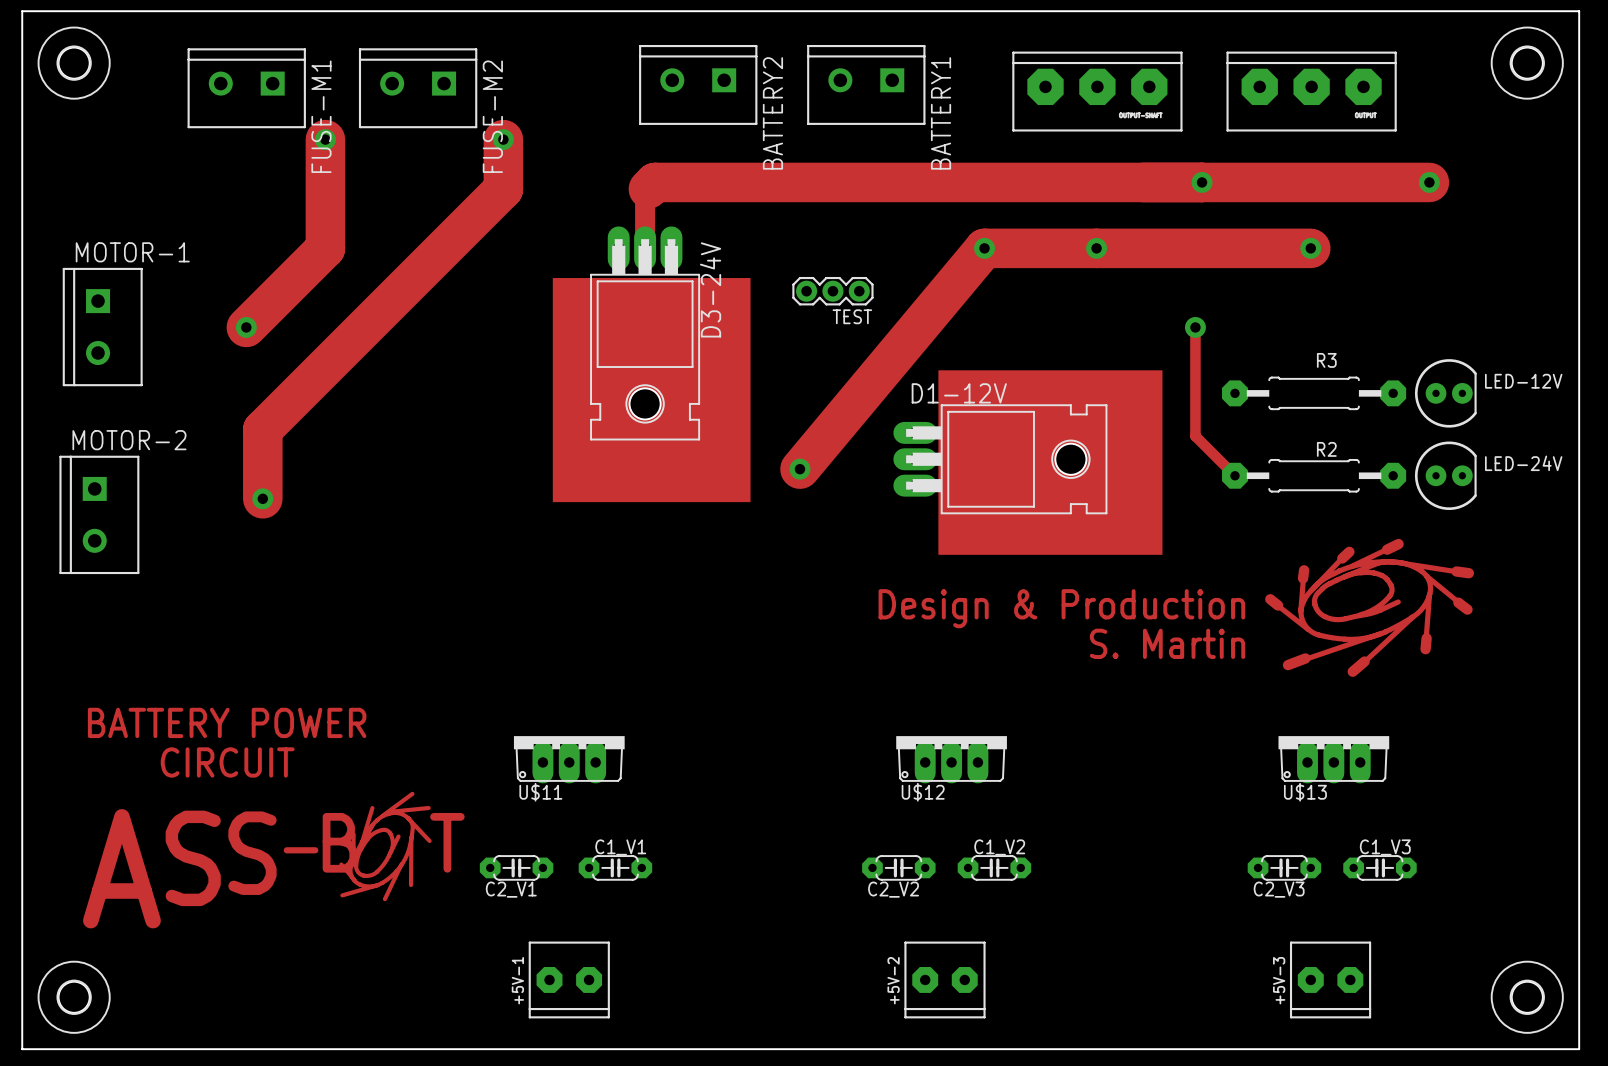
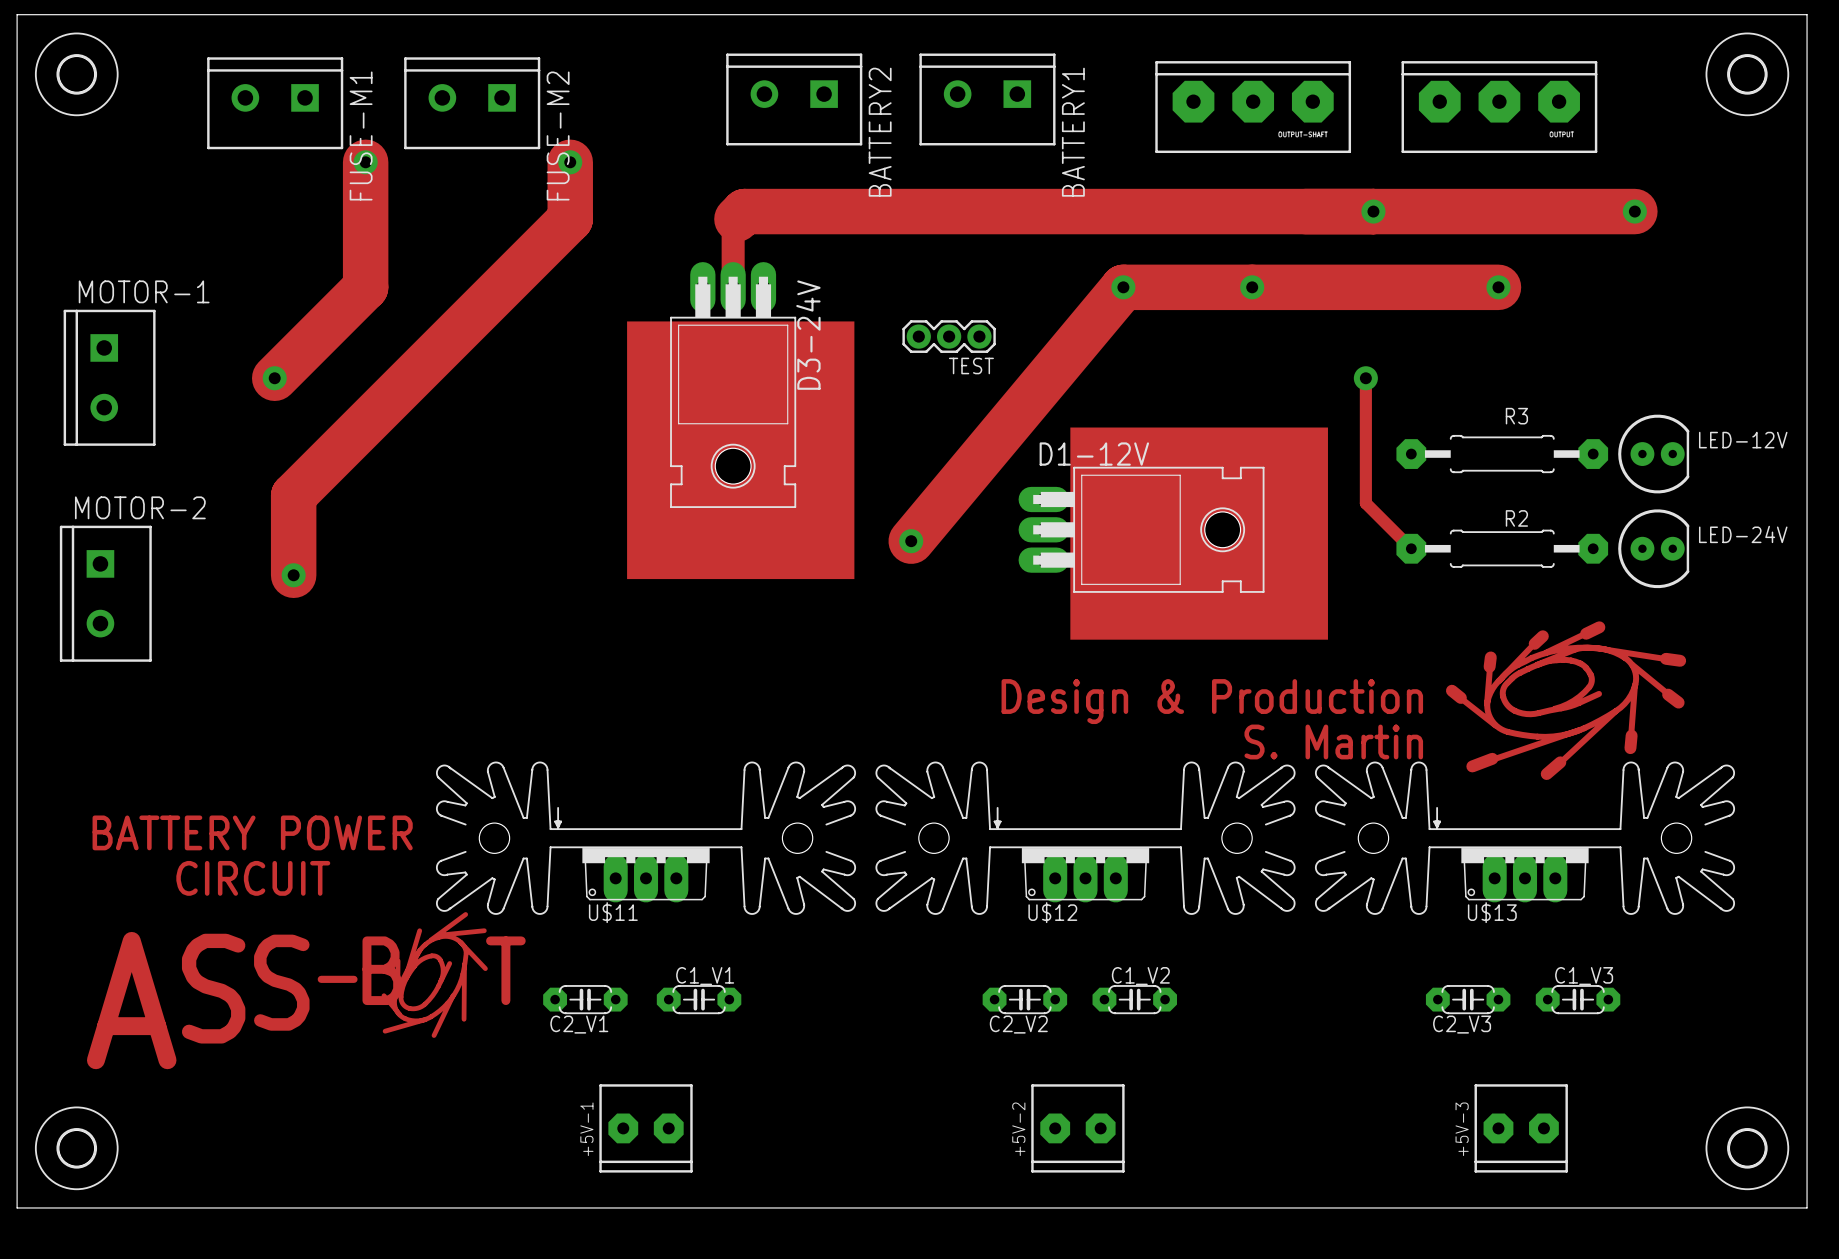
U$11 footprint: [513, 736, 625, 784] -> [435, 761, 857, 915]
U$12 footprint: [896, 736, 1007, 784] -> [875, 761, 1296, 915]
U$13 footprint: [1278, 736, 1390, 784] -> [1314, 761, 1736, 915]

